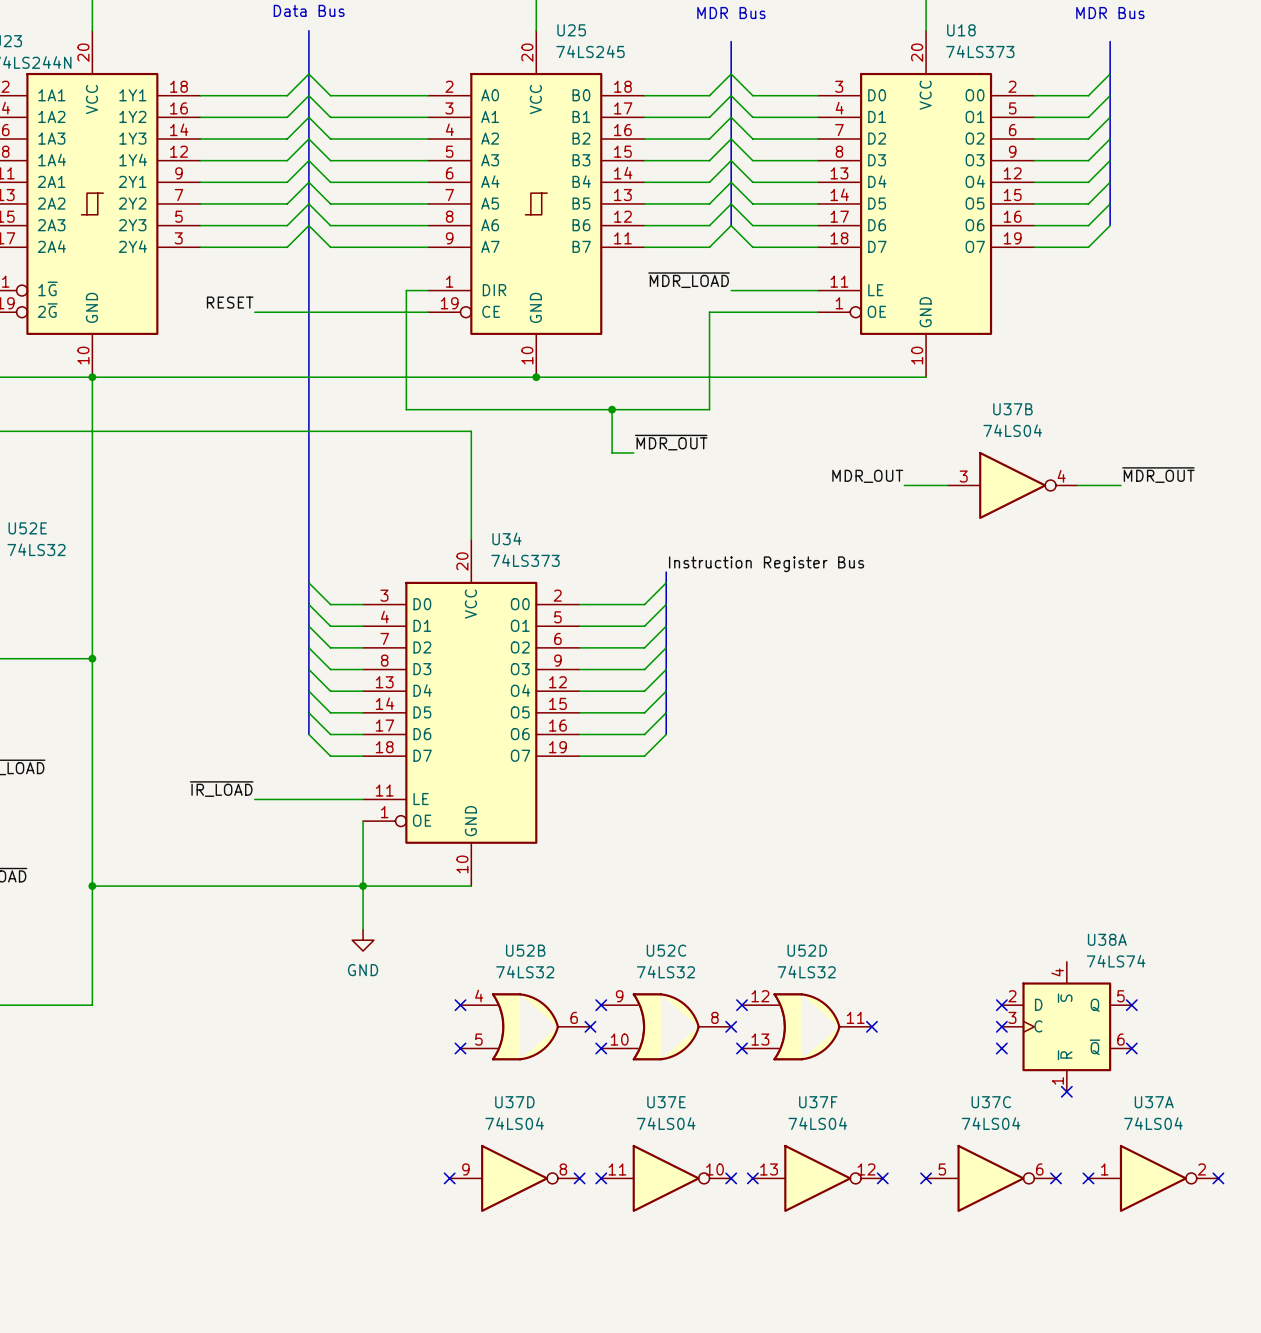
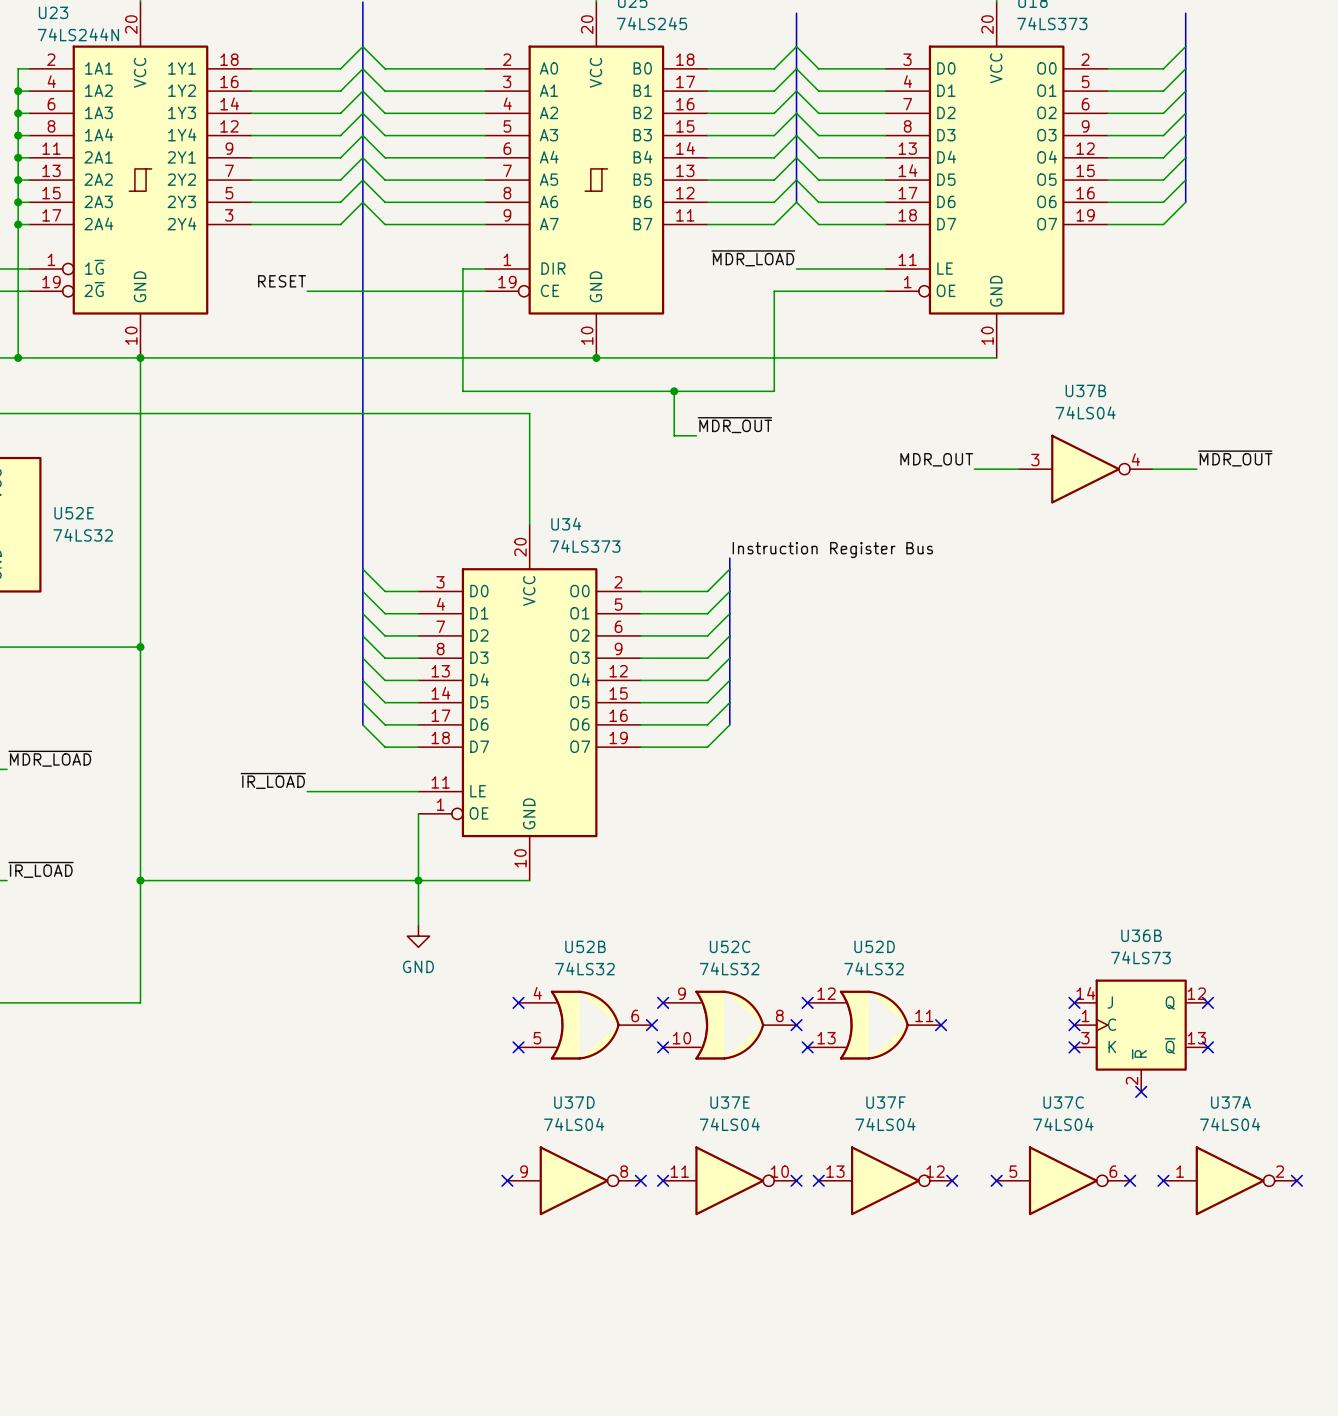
U38A: 74LS74 (1066, 1026) -> none
U36B: none -> 74LS73 (1141, 1035)

